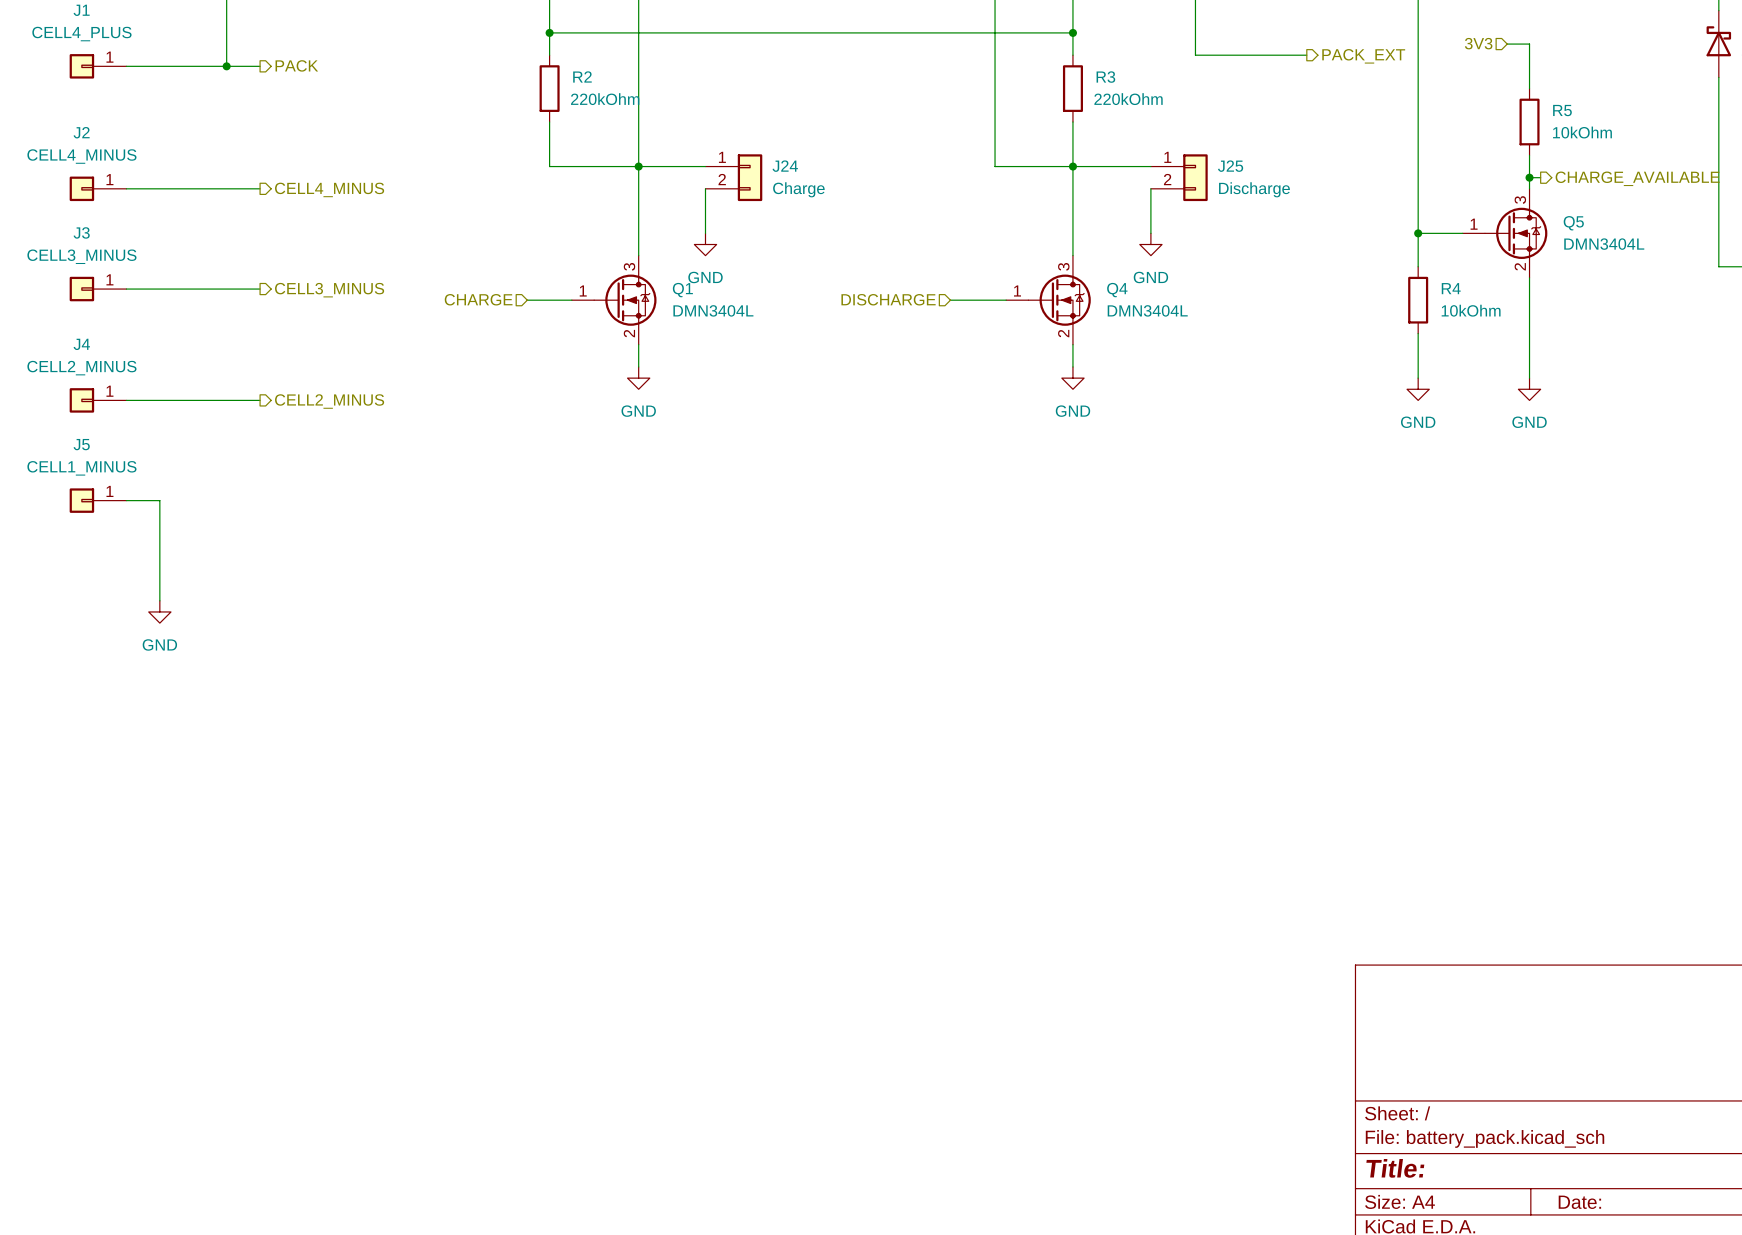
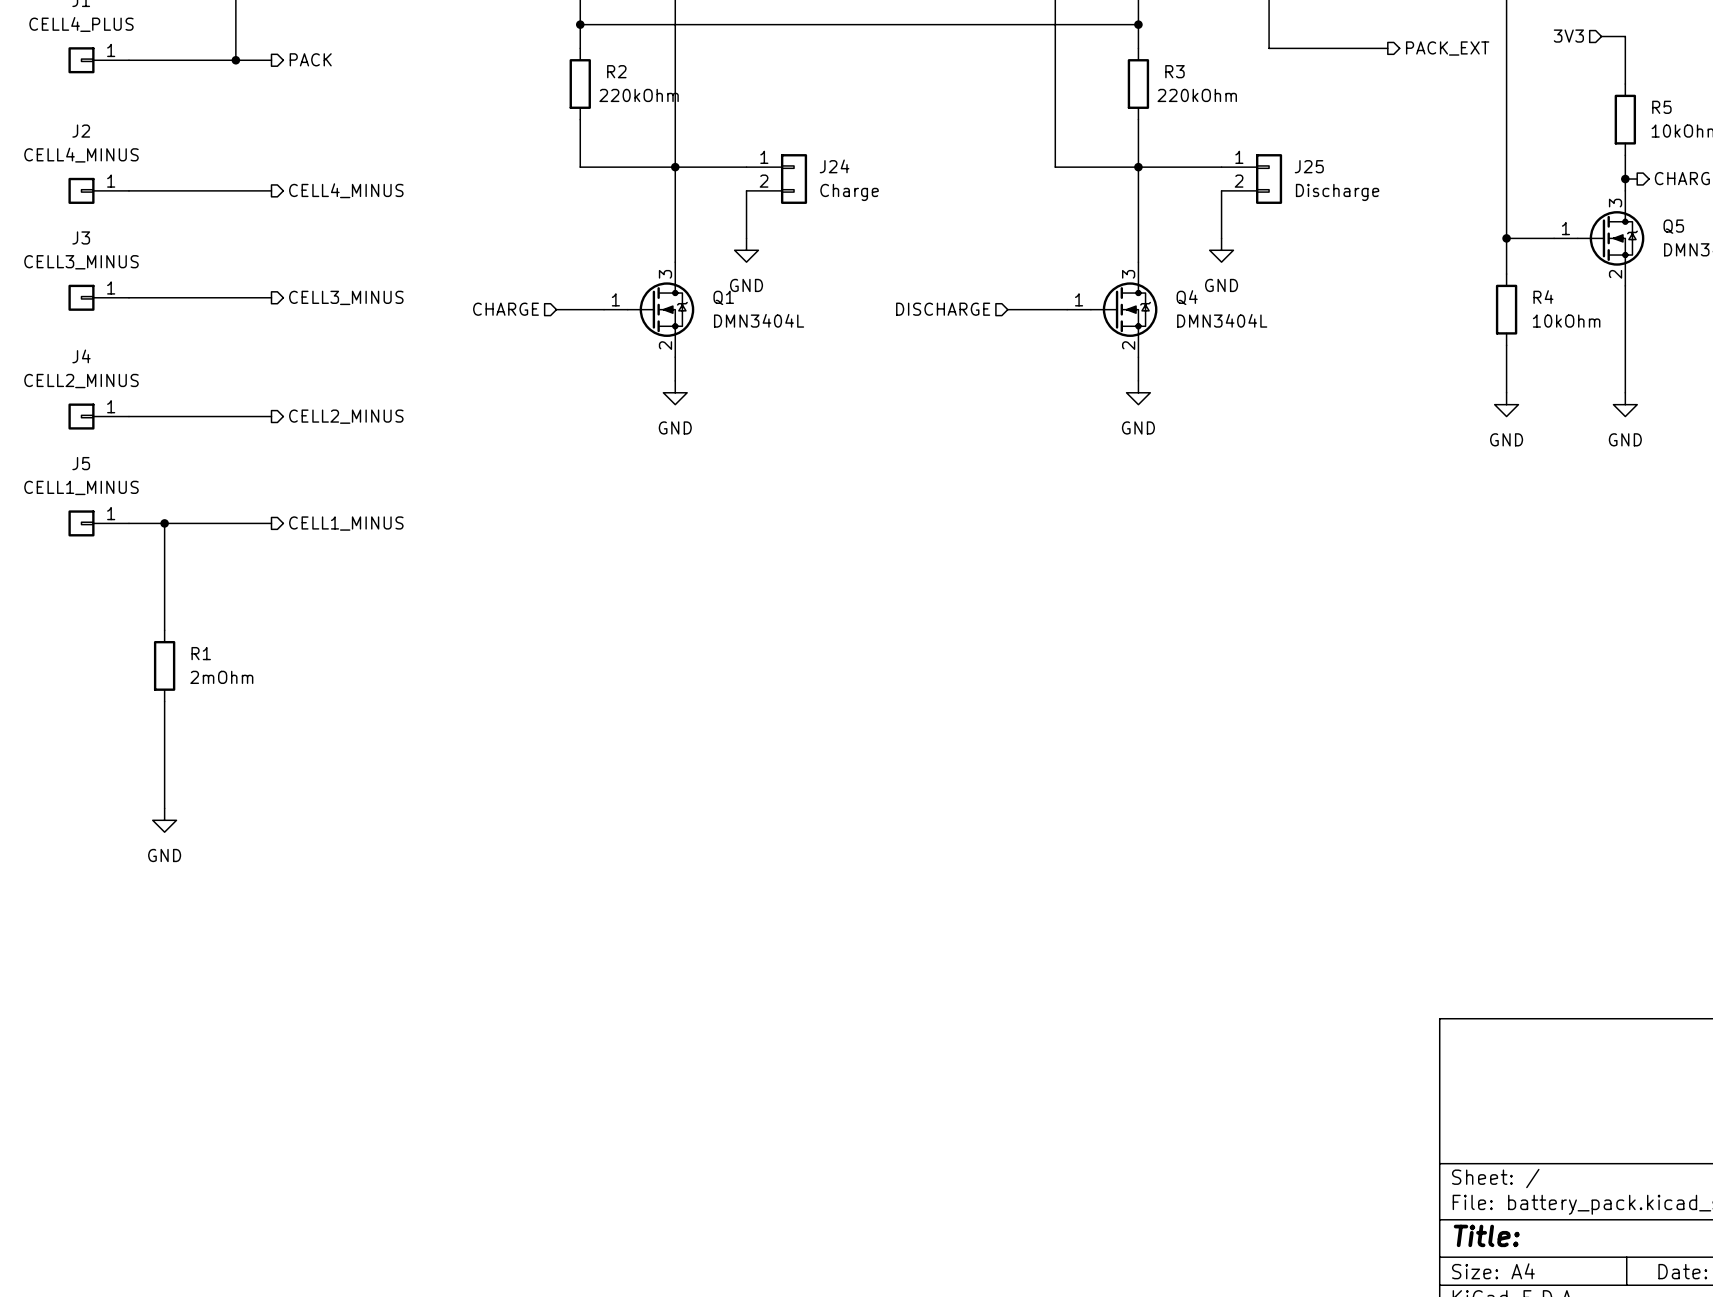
wire: none -> (164, 523) (271, 523)
junction: none -> (164, 523)
hierarchical label: none -> CELL1_MINUS (346, 523)
power symbol position: GND (159, 611) -> GND (164, 820)
R1: none -> 2mOhm (164, 665)
wire: none -> (164, 701) (164, 808)

